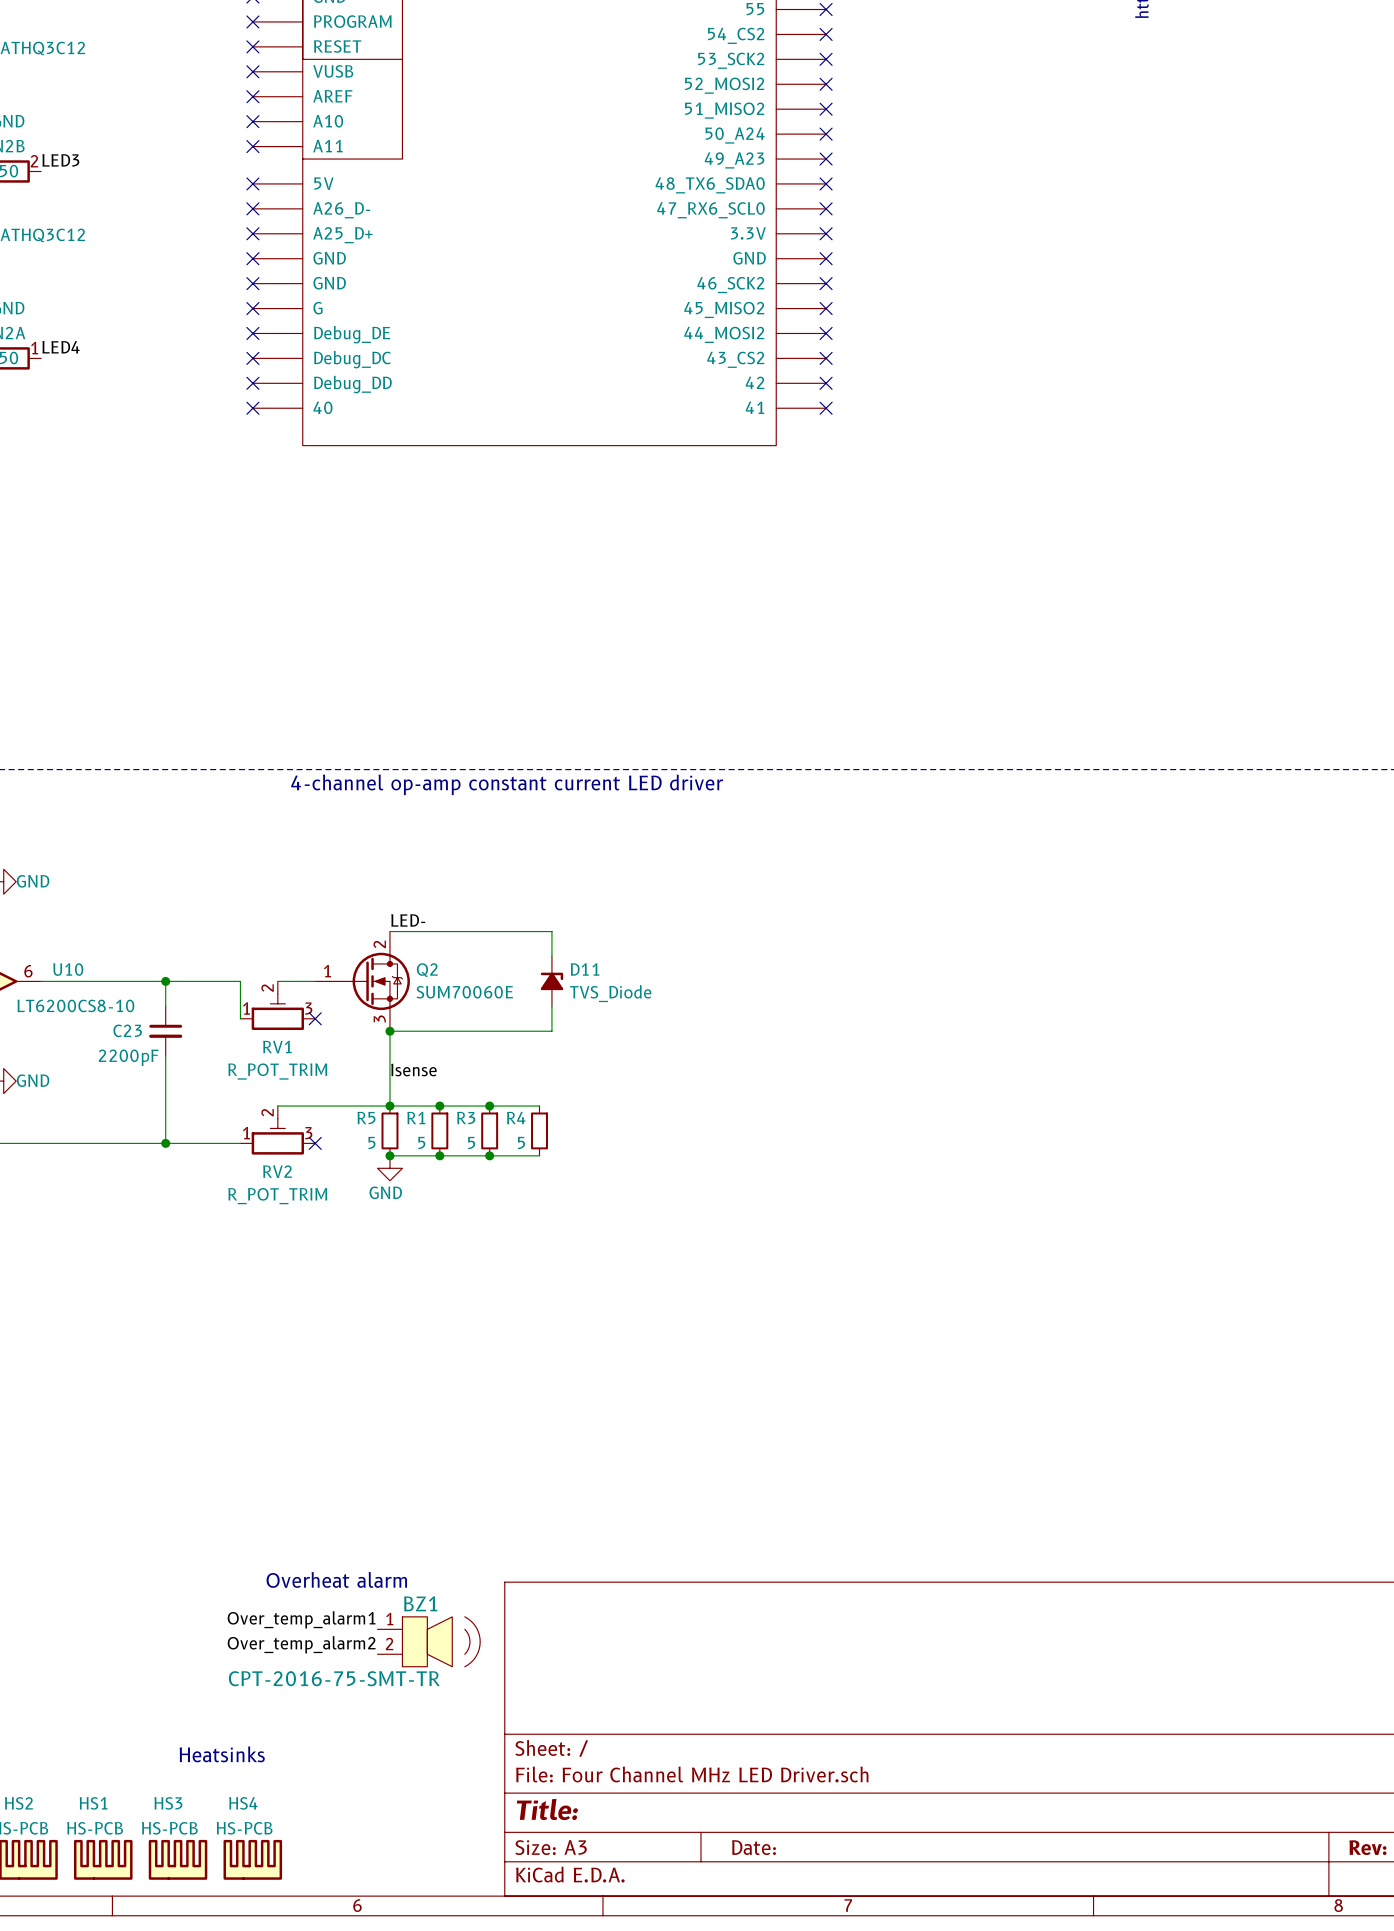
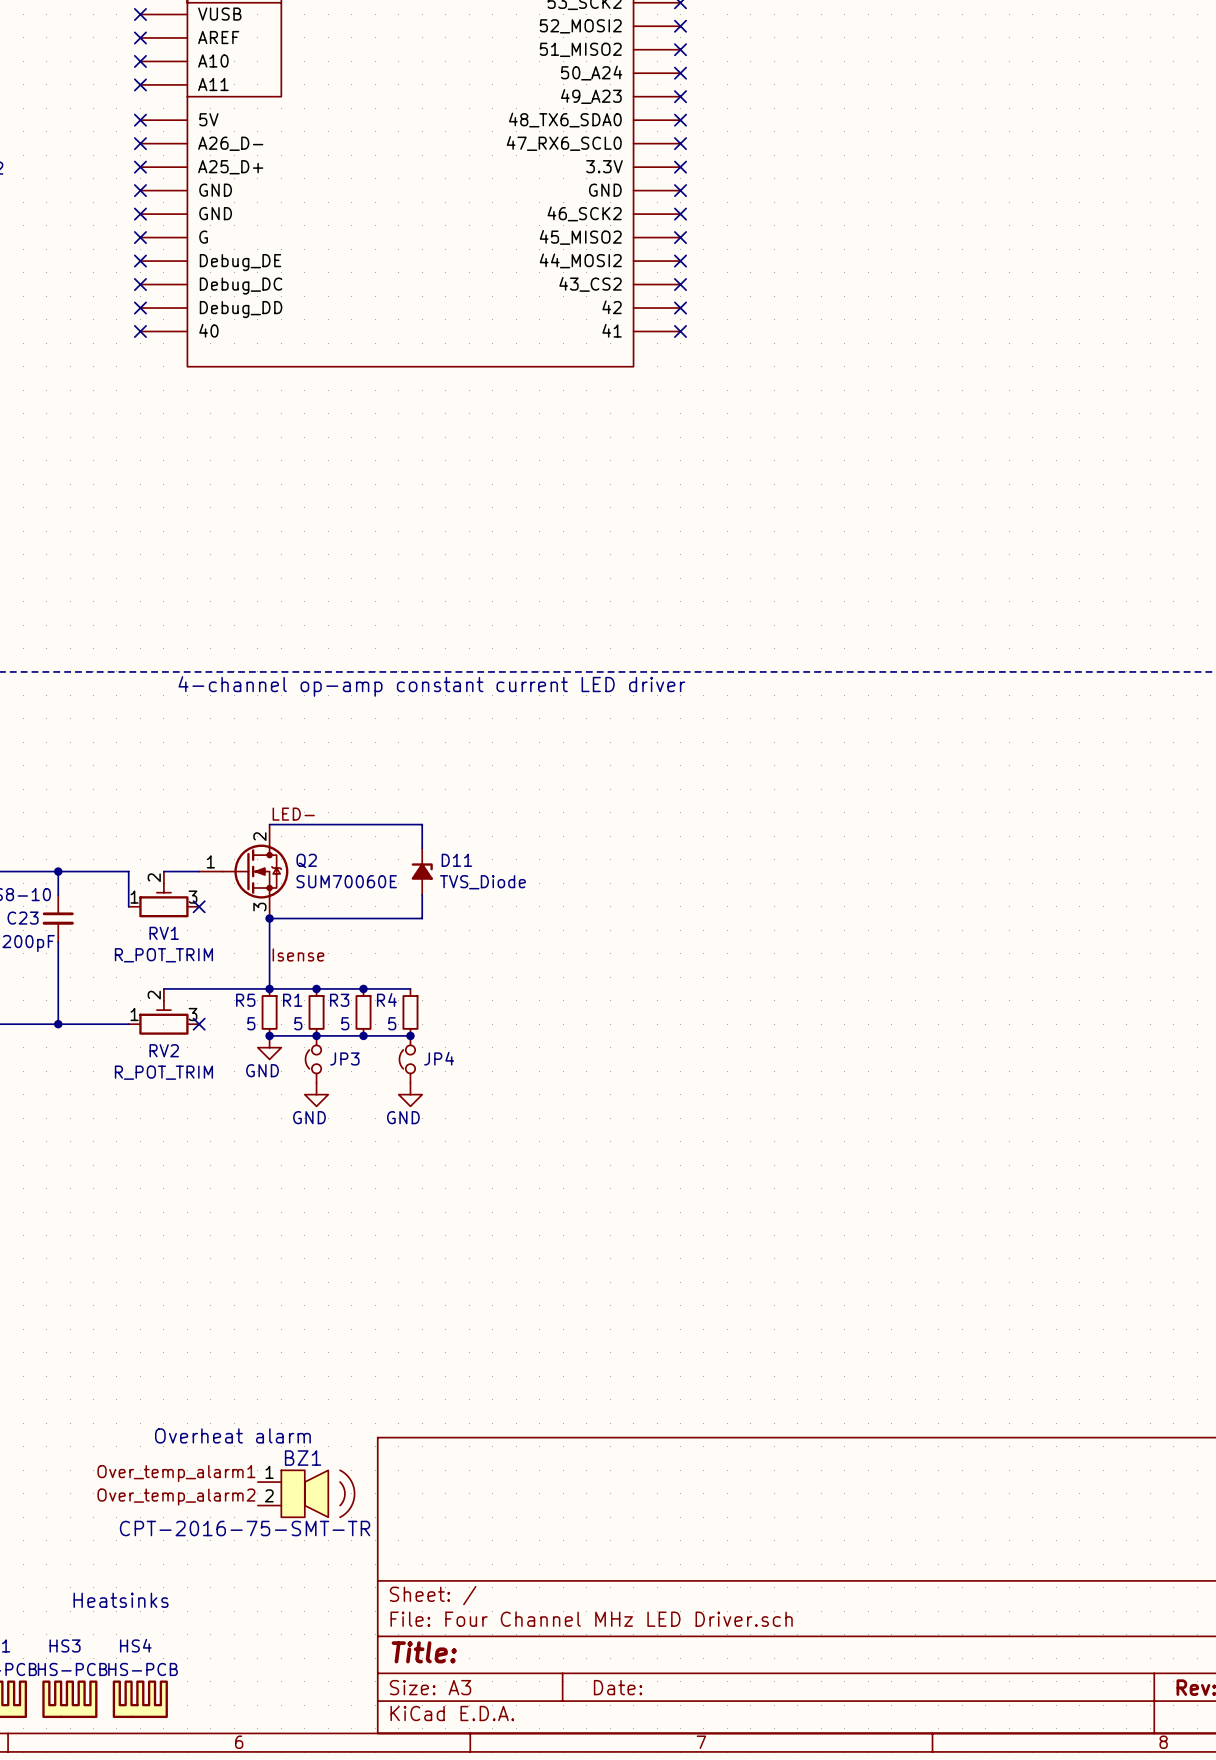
junction: none -> (410, 1035)
JP3: none -> (313, 1059)
JP4: none -> (407, 1059)
power symbol: none -> GND (316, 1094)
power symbol: none -> GND (410, 1094)

